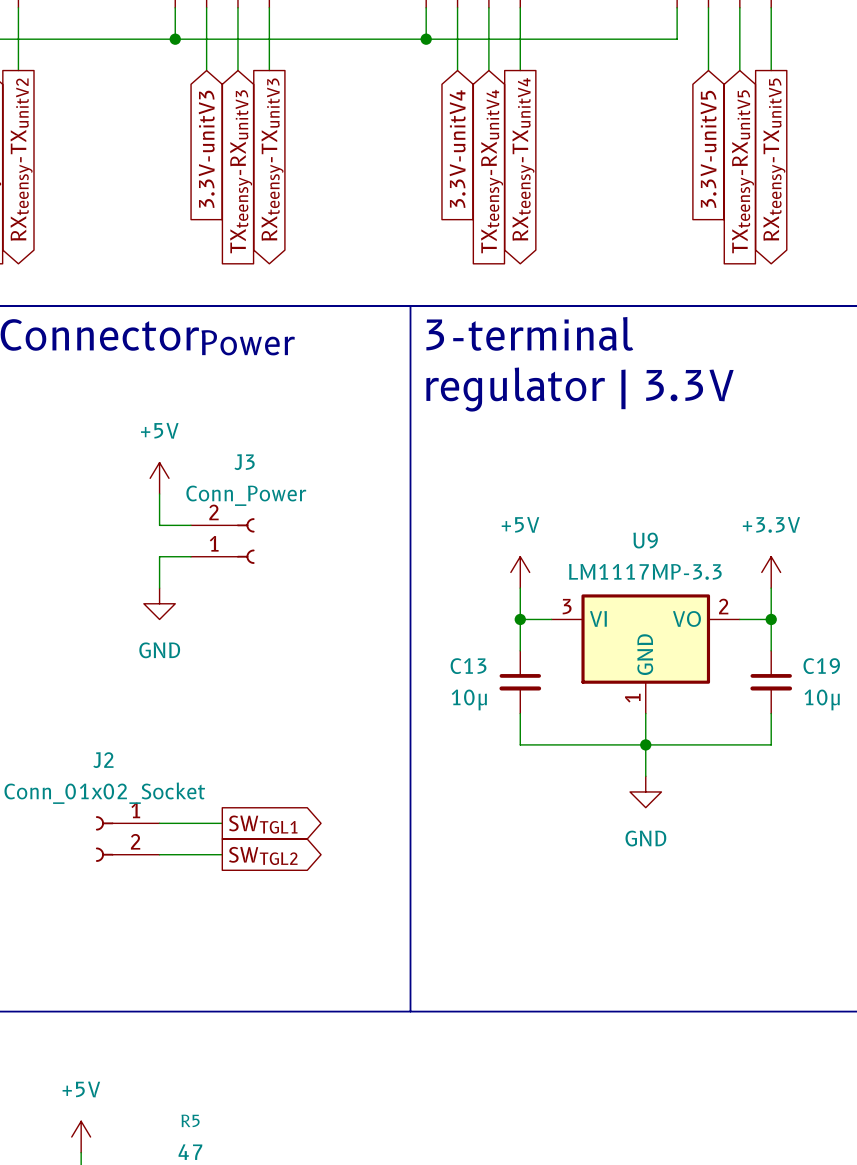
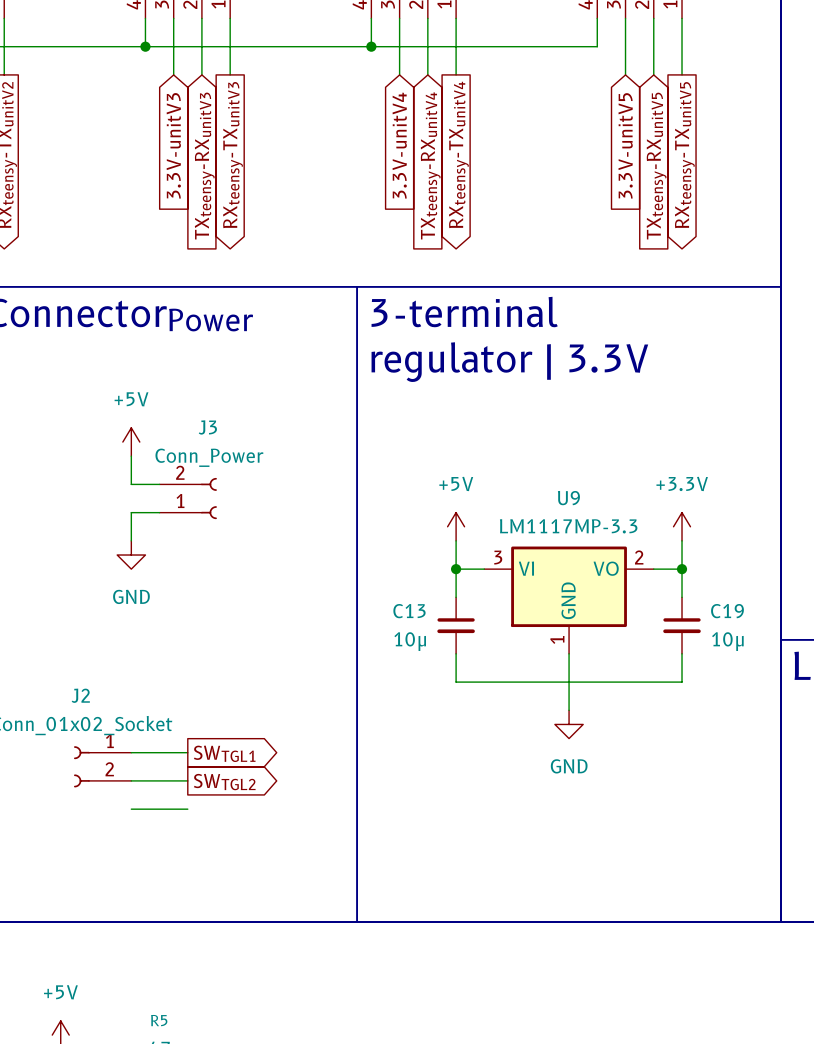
junction: (645, 744) -> none
wire: none -> (131, 809) (187, 809)

